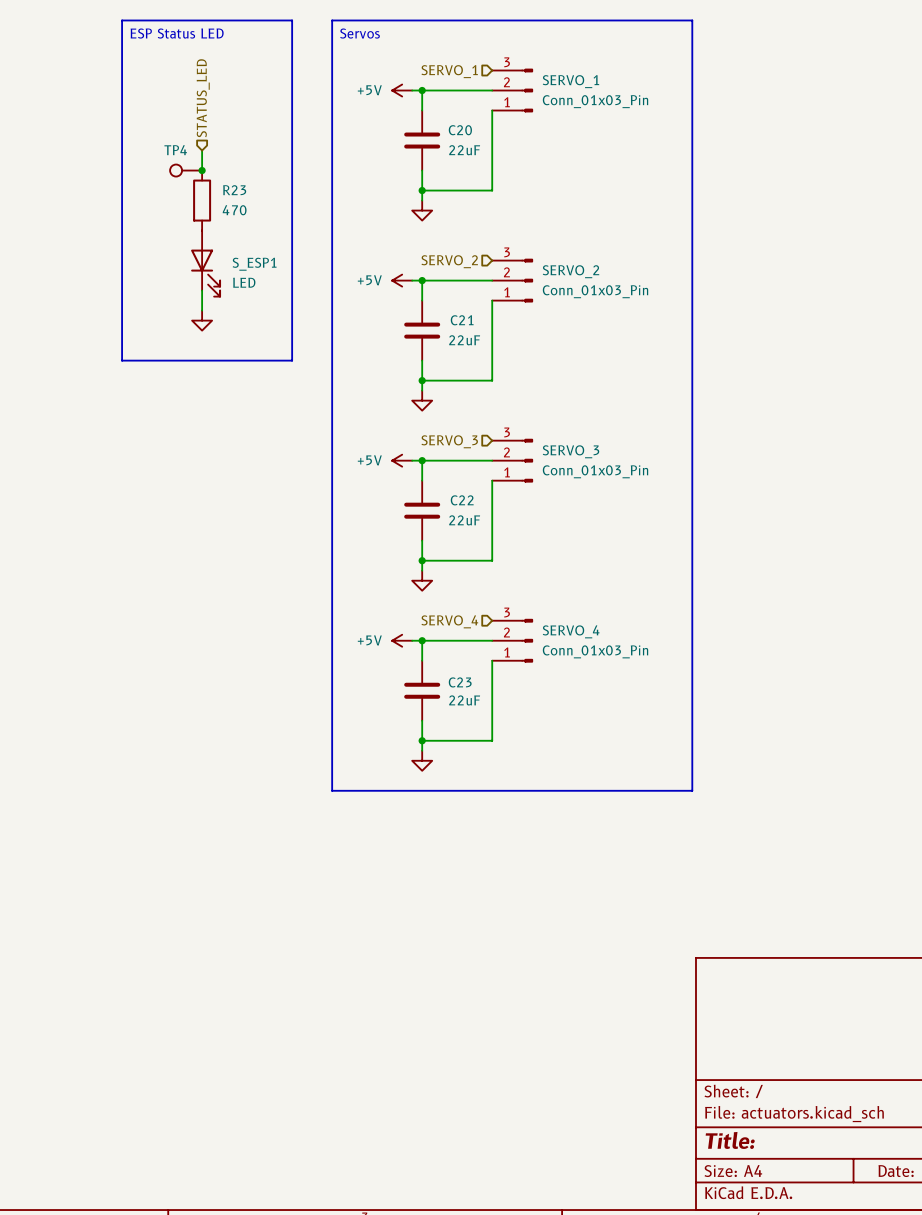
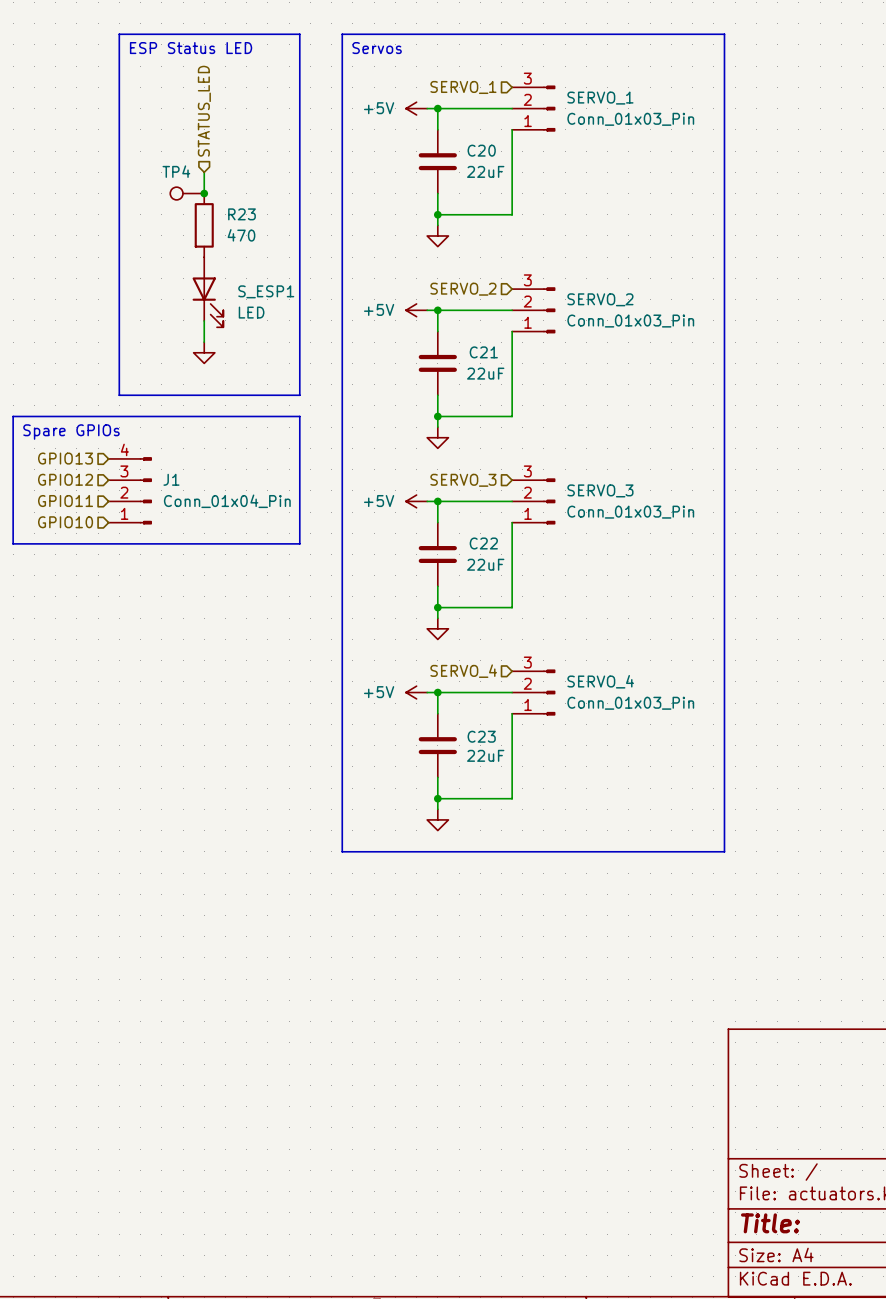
line: none -> (13, 416) (299, 416) (299, 543) (13, 543) (13, 416)
text: none -> Spare GPIOs (71, 432)
hierarchical label: none -> GPIO13 (65, 458)
hierarchical label: none -> GPIO12 (65, 479)
J1: none -> Conn_01x04_Pin (130, 490)
hierarchical label: none -> GPIO11 (65, 501)
hierarchical label: none -> GPIO10 (65, 522)

